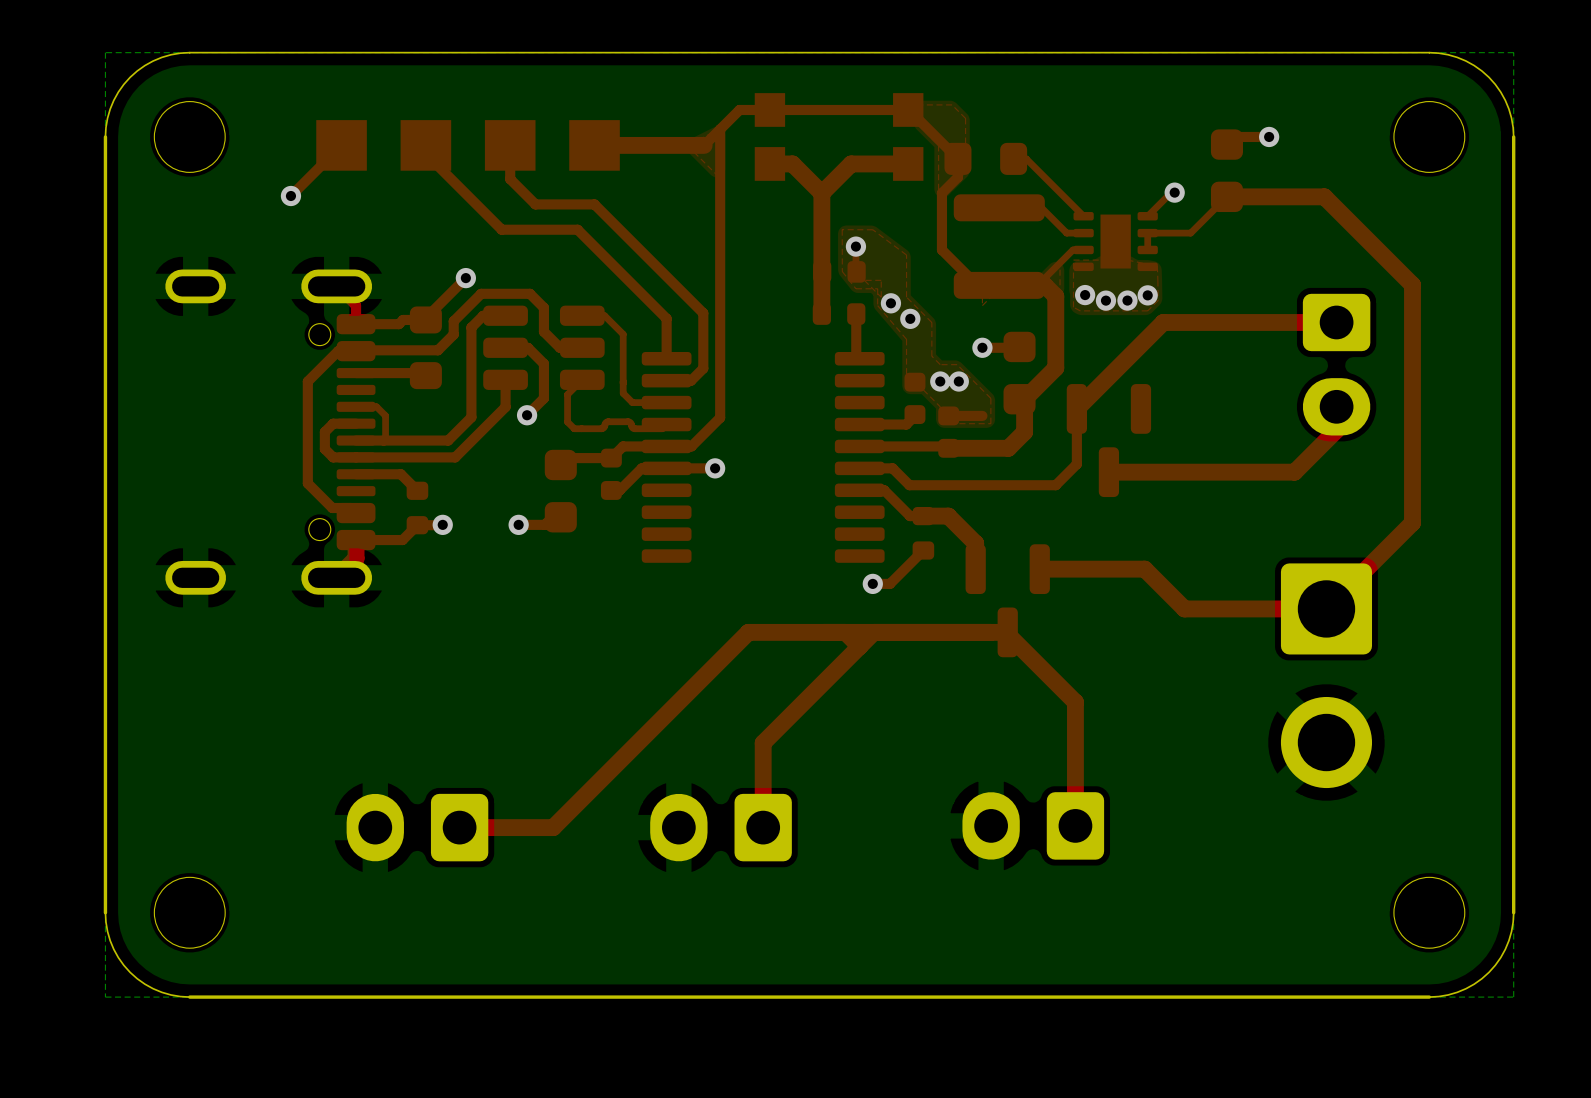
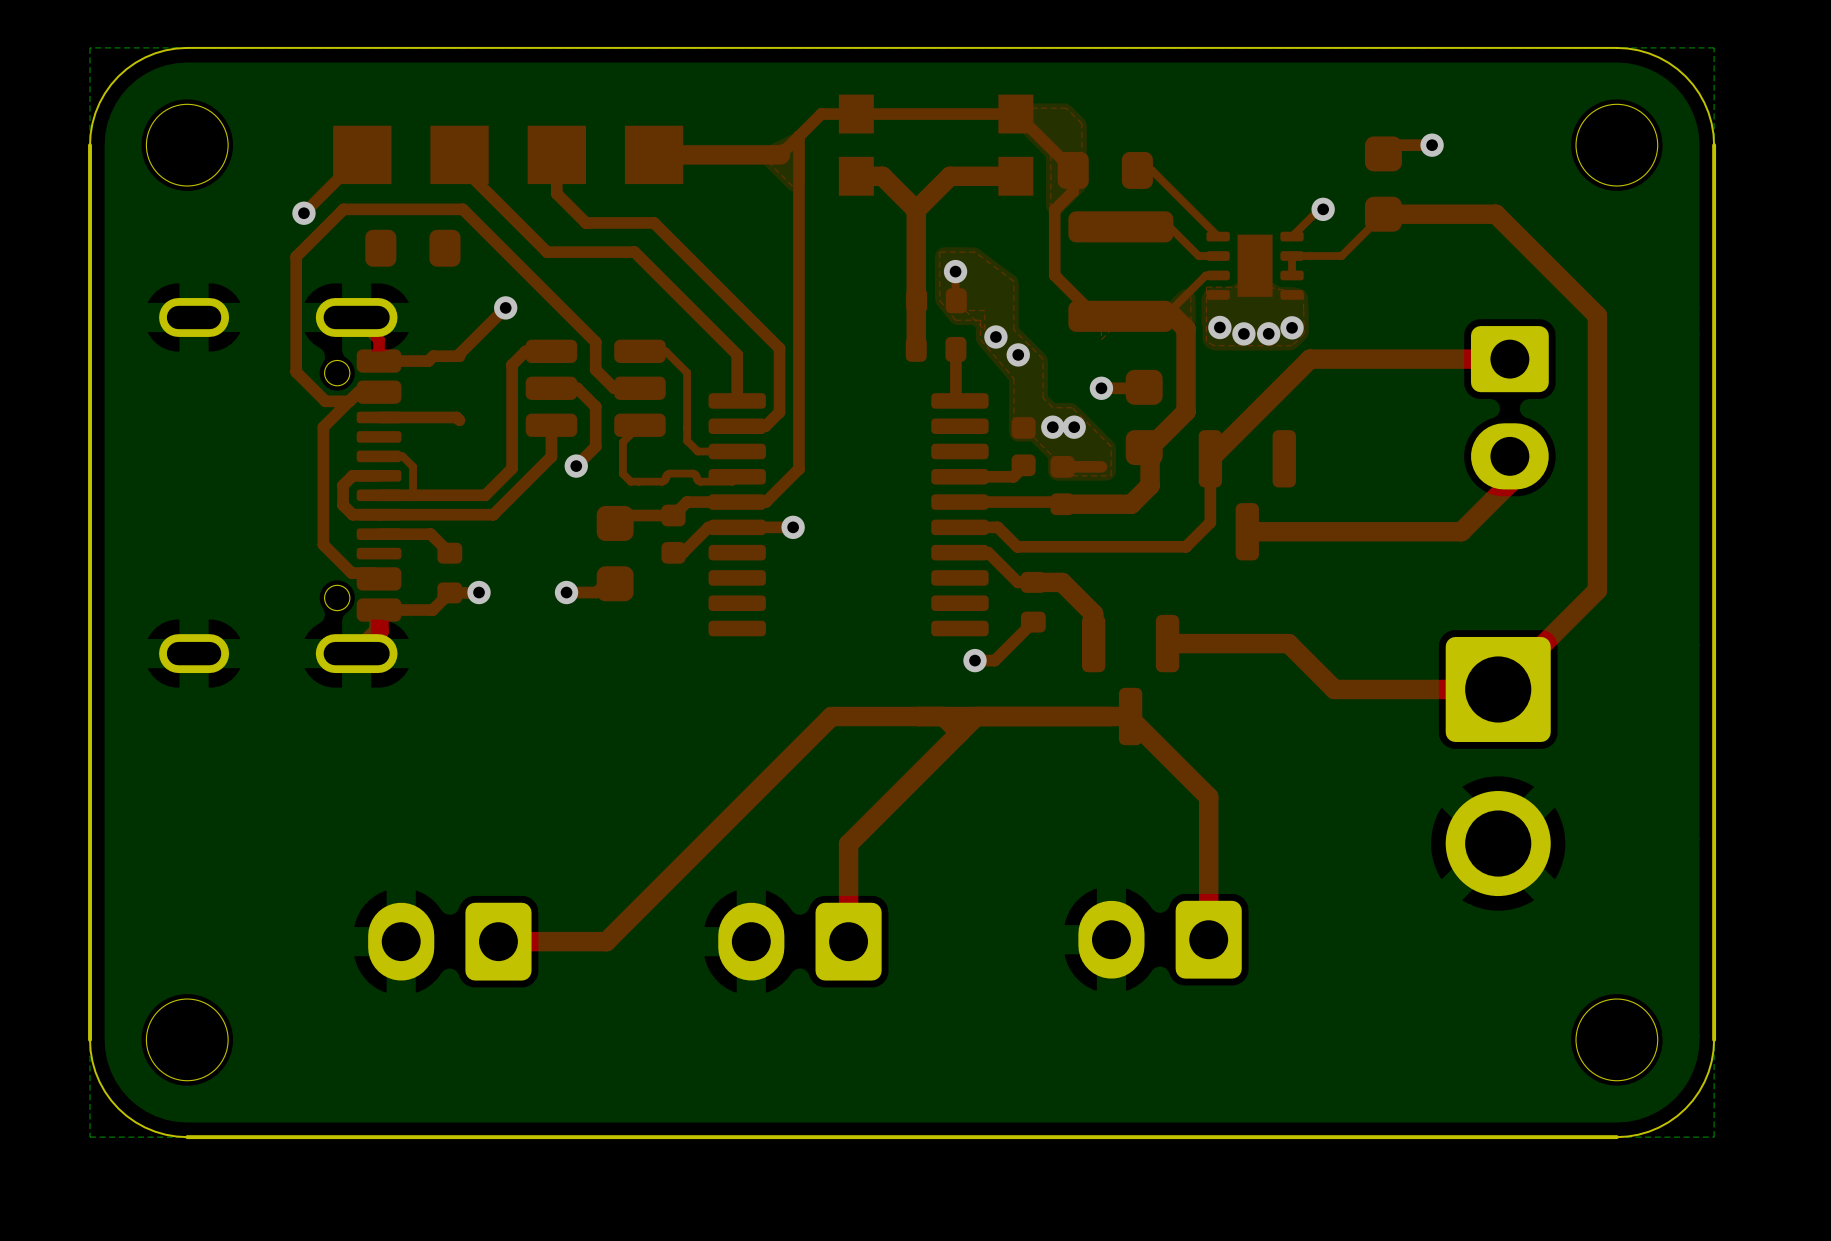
top track: (529, 293) (481, 293) (453, 321) (453, 334) (437, 350) (356, 351) -> (579, 326) (462, 209) (343, 209) (296, 256) (296, 371) (325, 401) (349, 401)
part rotation: 0° (425, 347) -> 90° clockwise (412, 248)
part position: (425, 347) -> (412, 248)

